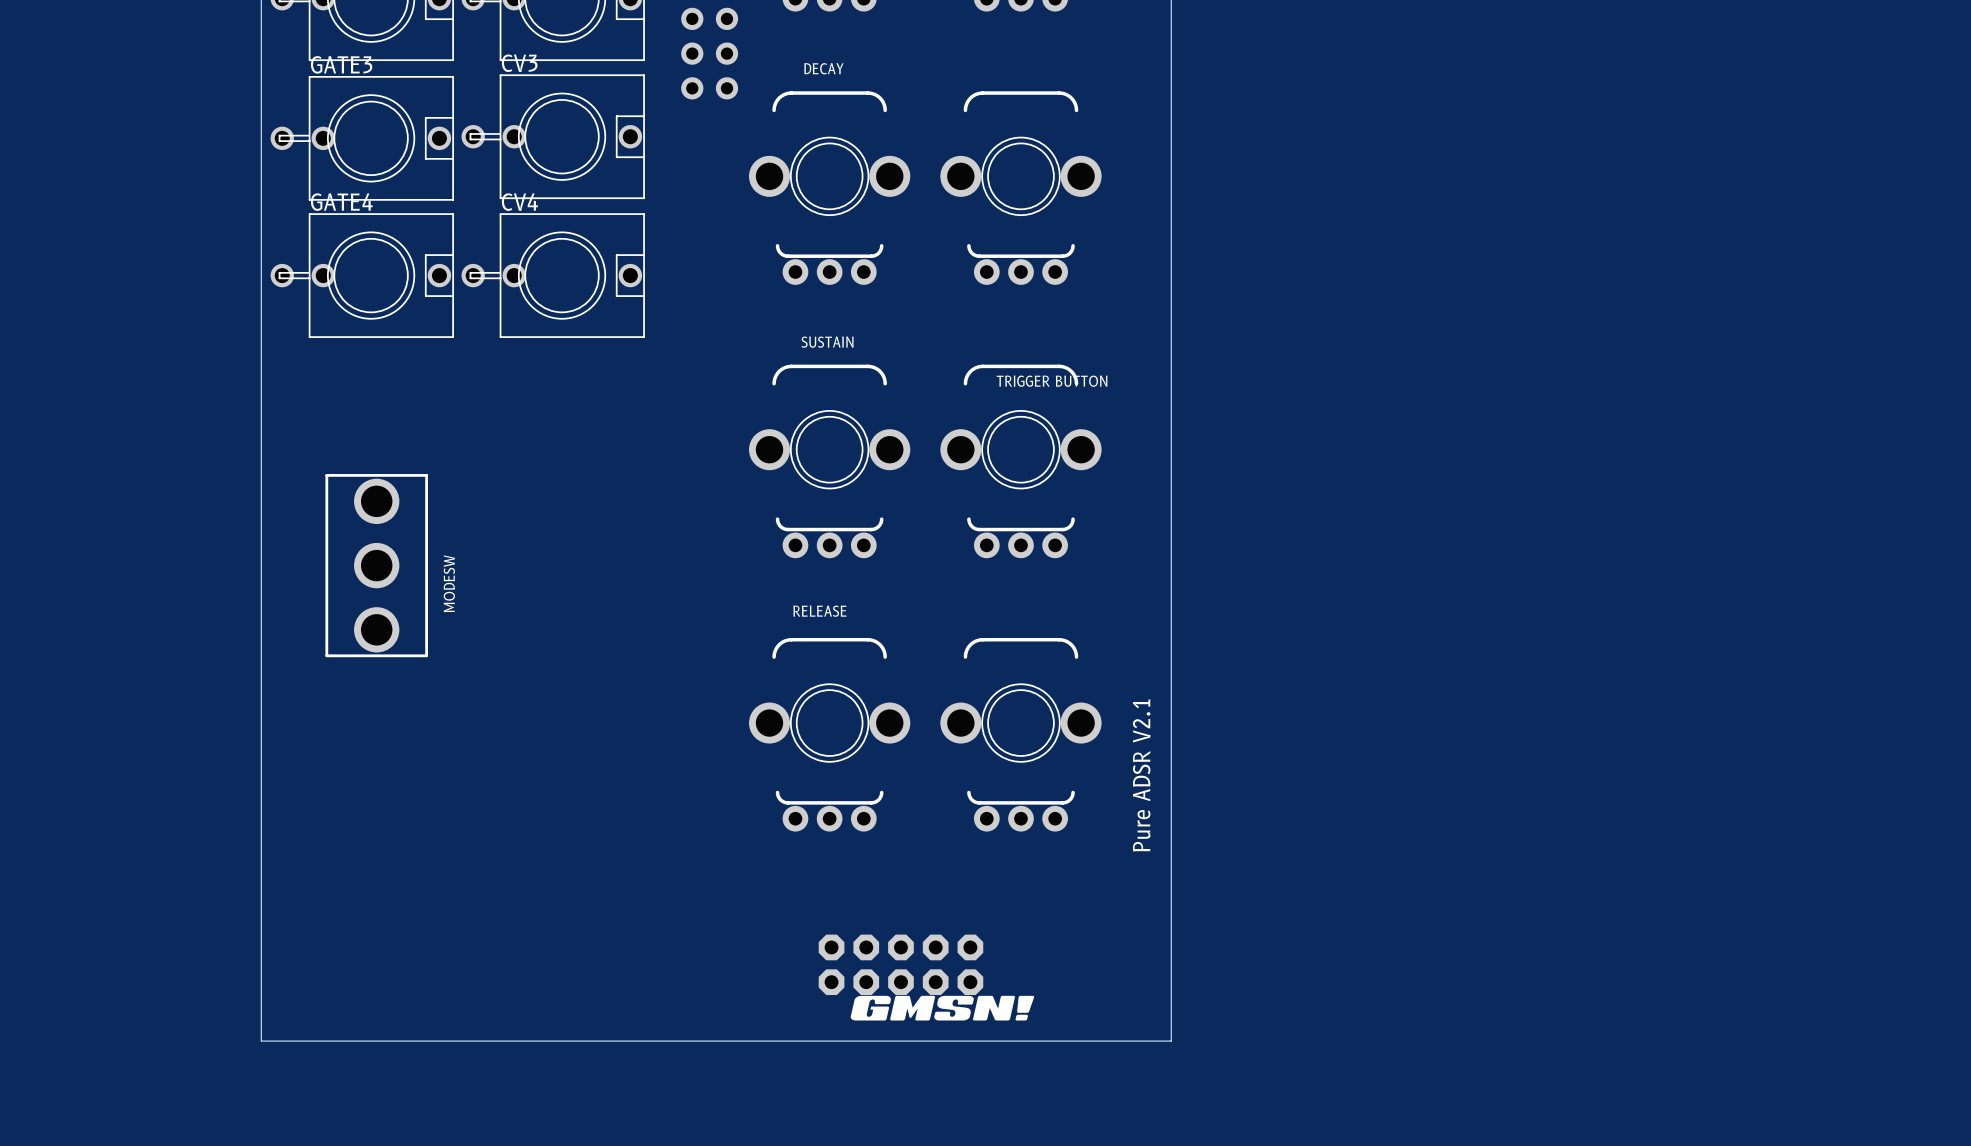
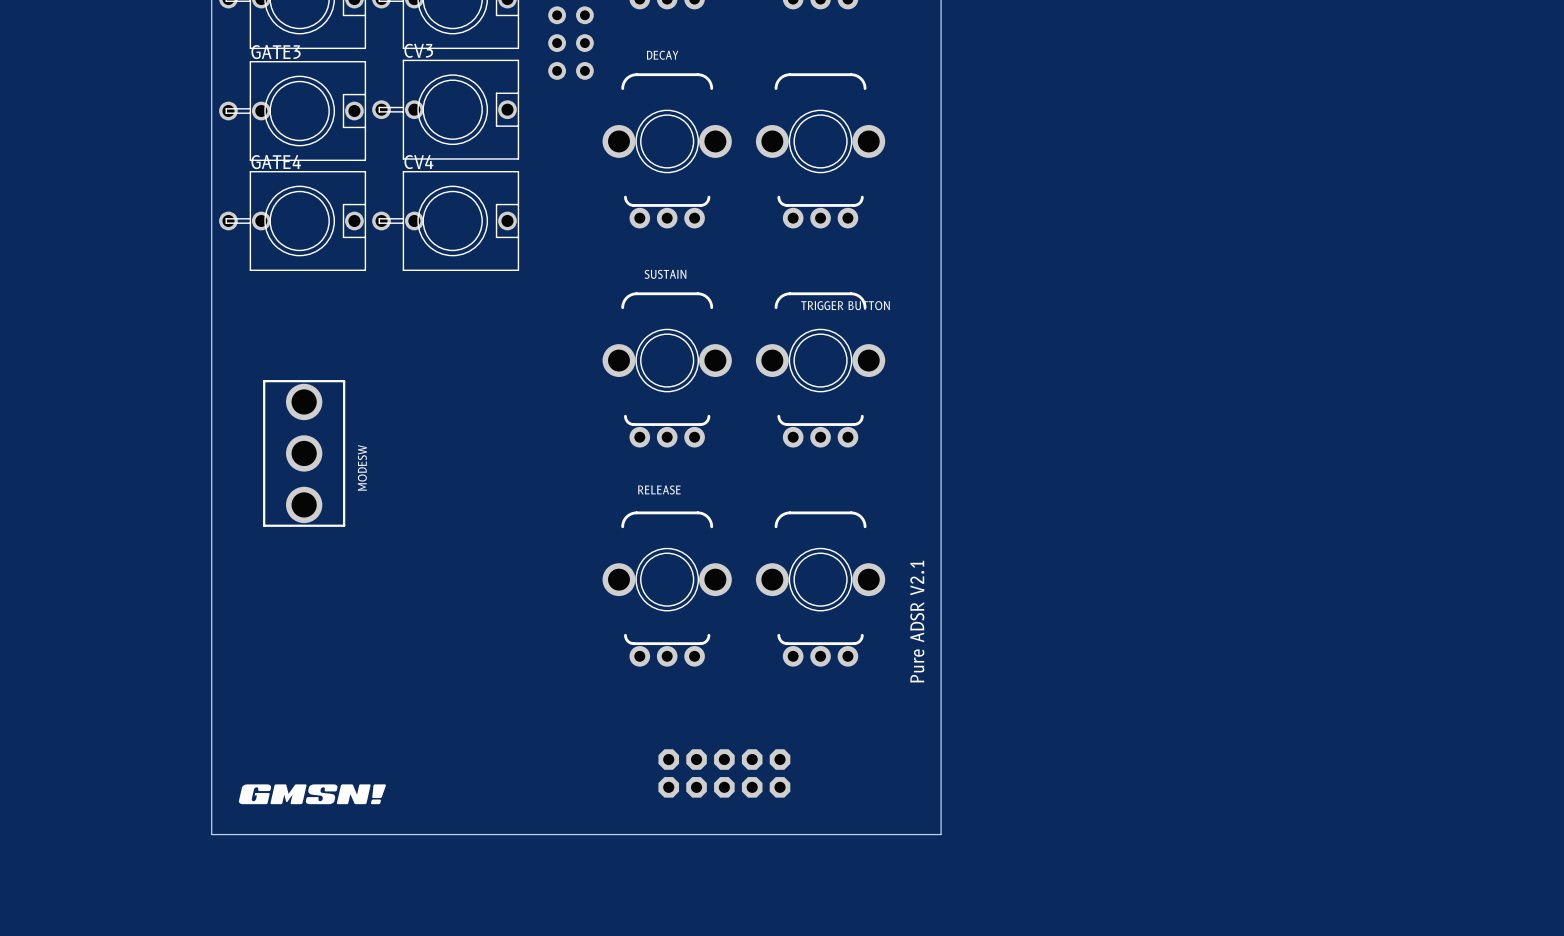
drawing: none -> [238, 784, 386, 805]
drawing: [850, 995, 1035, 1021] -> none

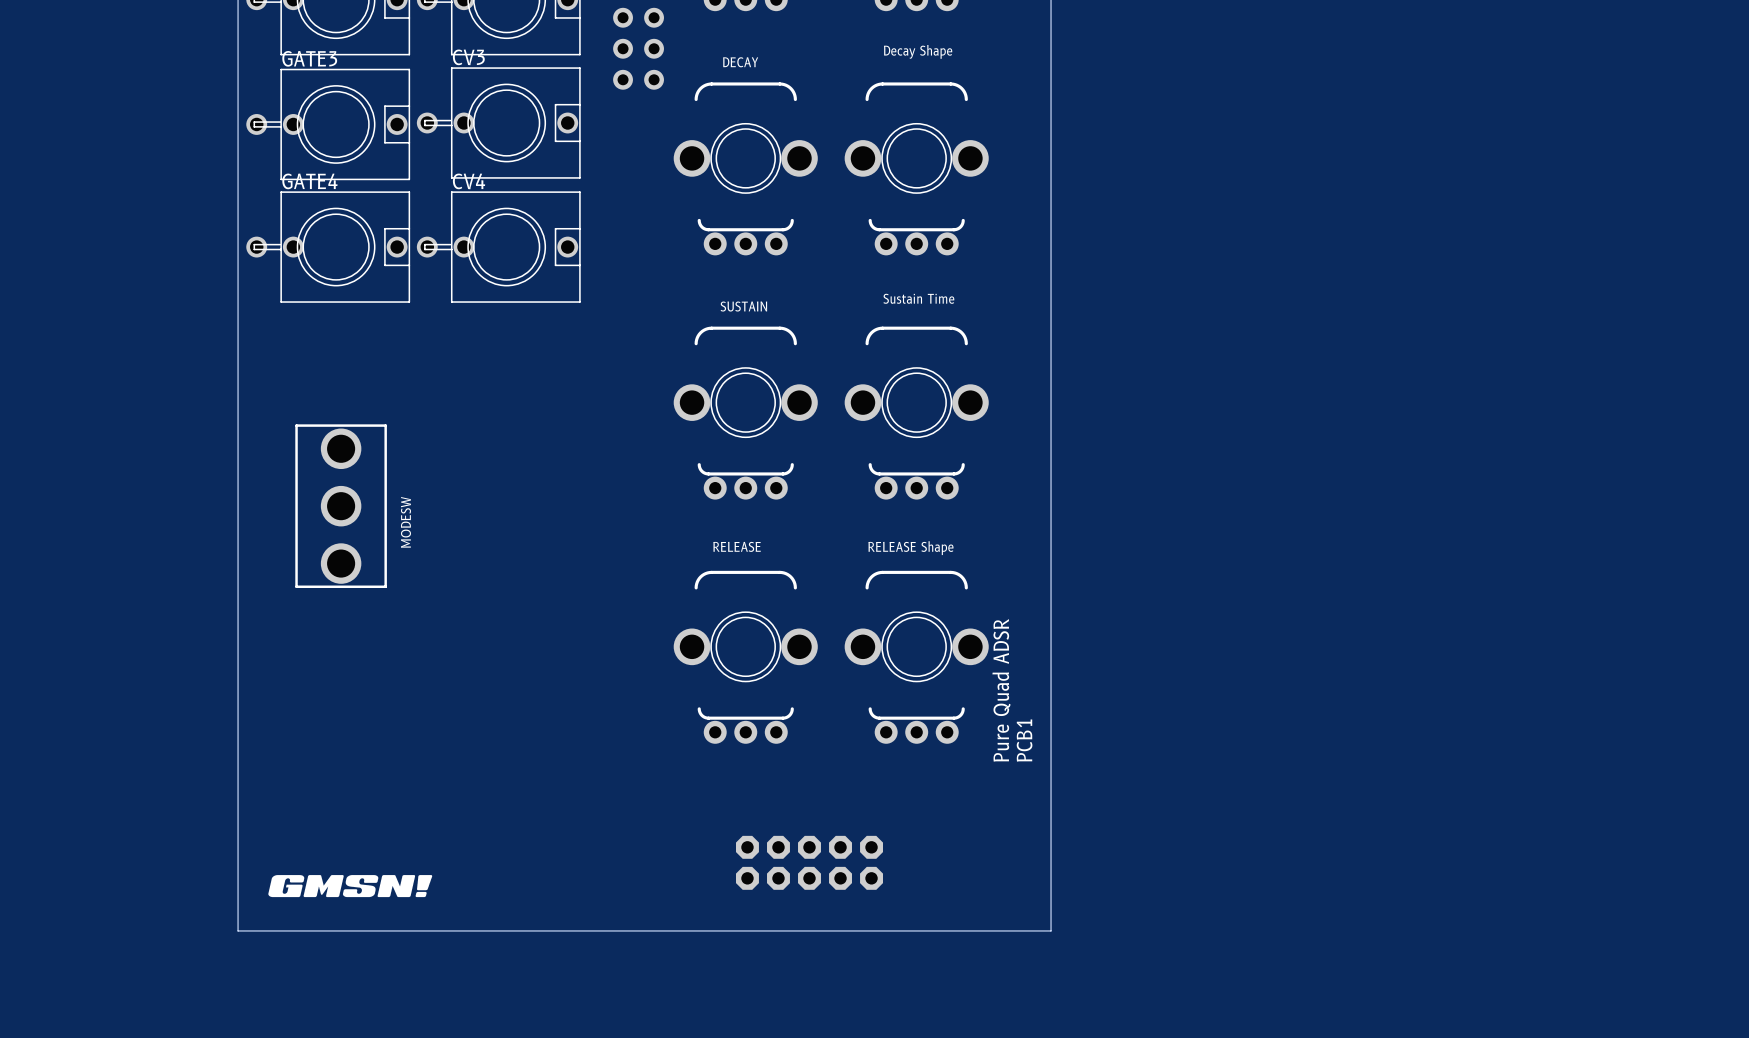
text: none -> Decay Shape (918, 51)
text: none -> Sustain Time (918, 298)
text: TRIGGER BUTTON (845, 305) -> none
text: none -> RELEASE Shape (910, 548)
text: none -> Pure Quad ADSR (1001, 690)
text: Pure ADSR V2.1 (917, 621) -> PCB1 (1024, 740)

